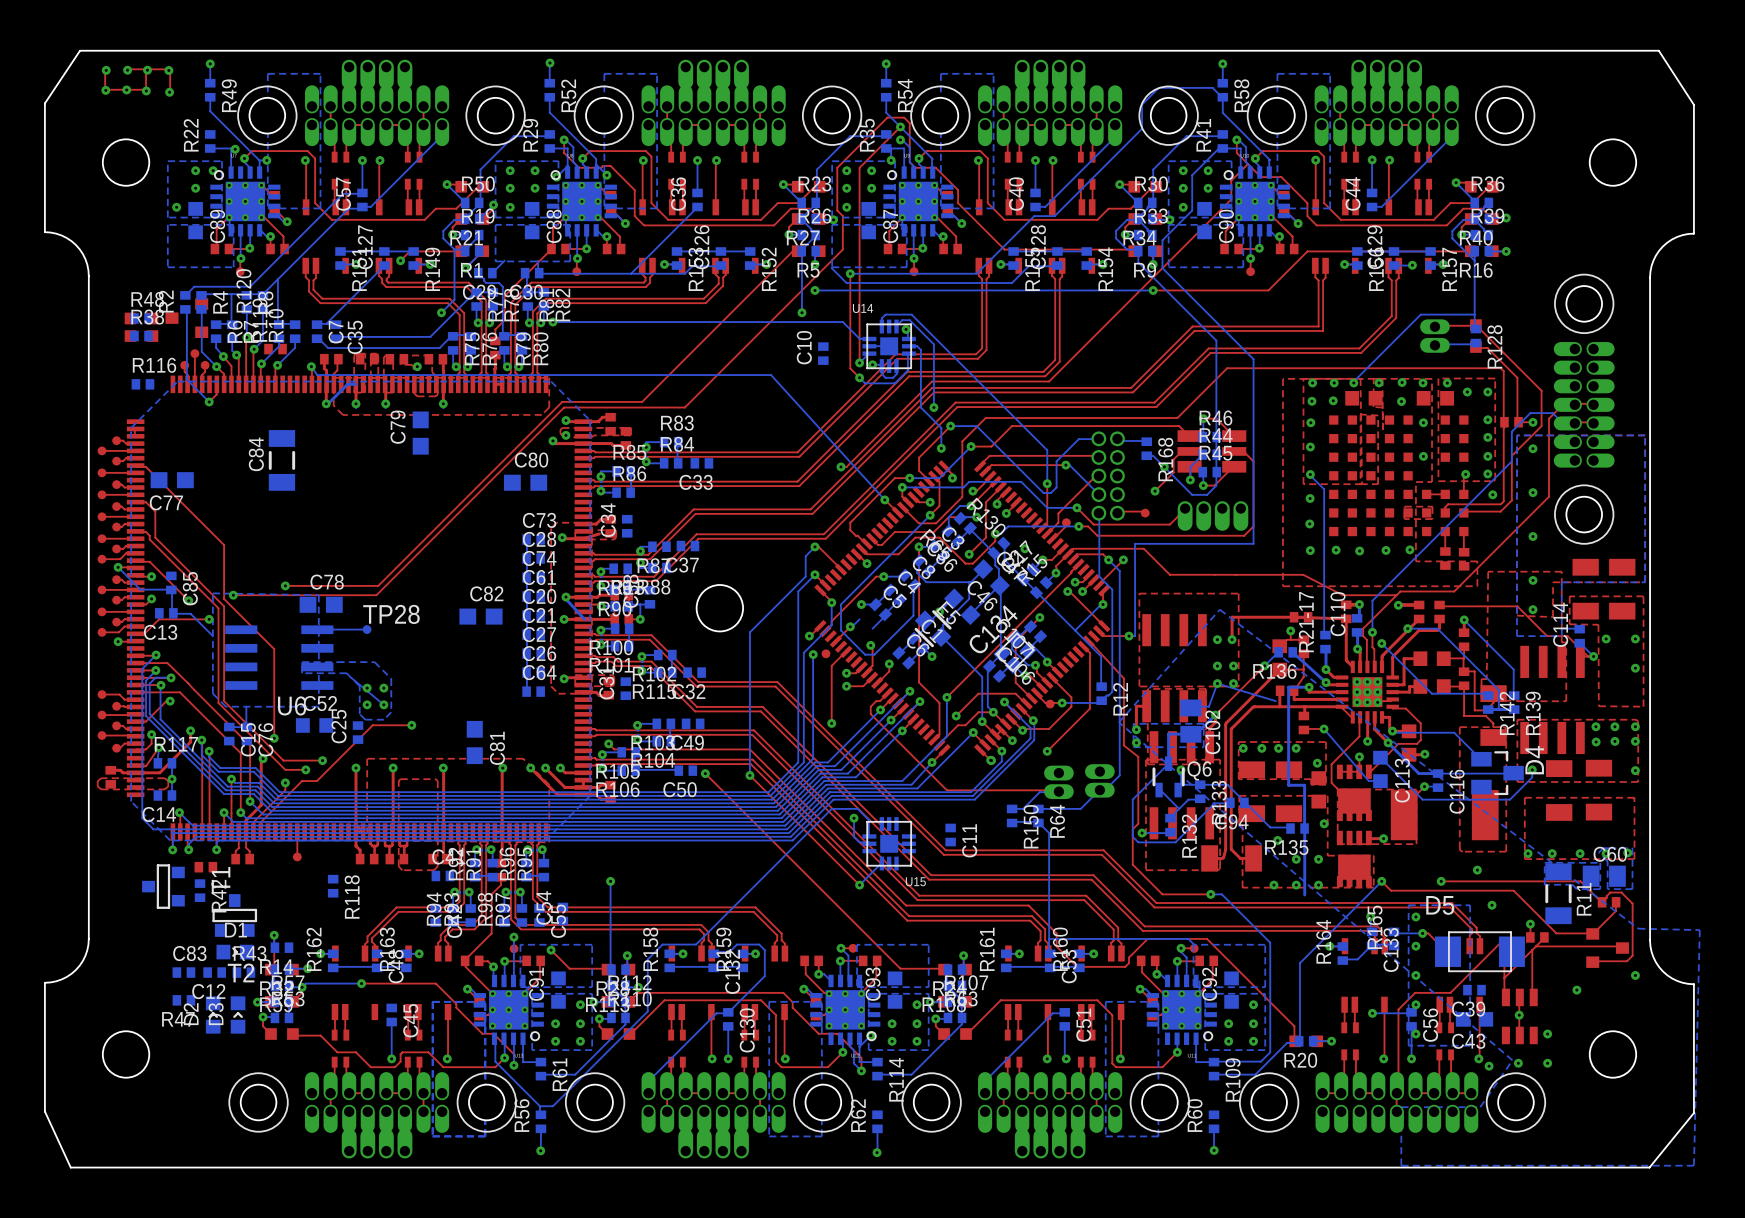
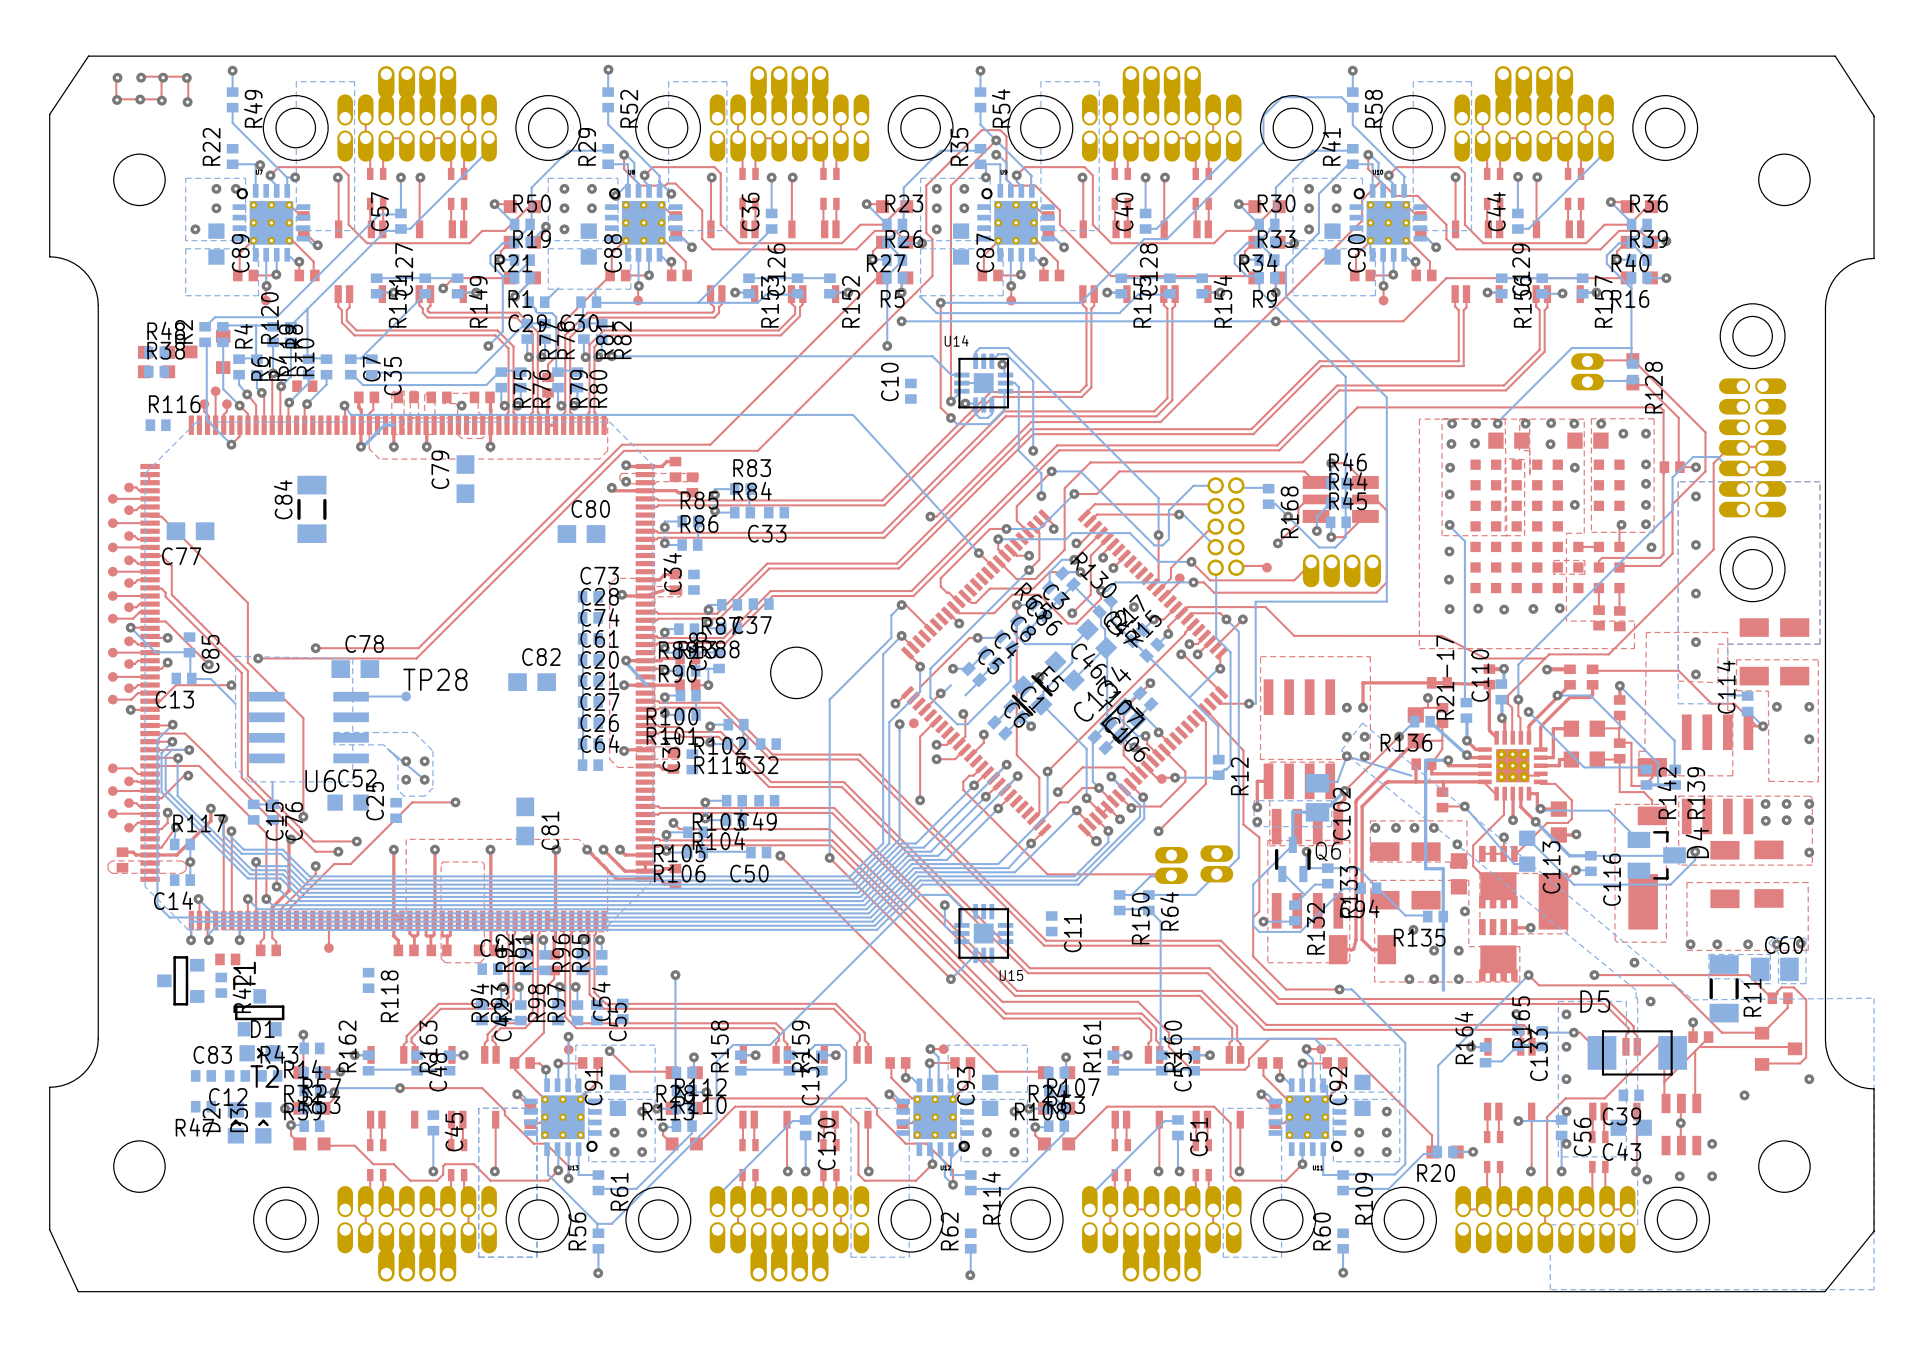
bottom zone outline: (1480, 1107) (1512, 1060) (1118, 722) (1219, 609) (1638, 928) (1699, 930) (1693, 1165) -> (1637, 1224) (1637, 998) (1636, 998) (1636, 990) (1341, 750) (1362, 723) (1692, 999) (1874, 998) (1874, 1289)

